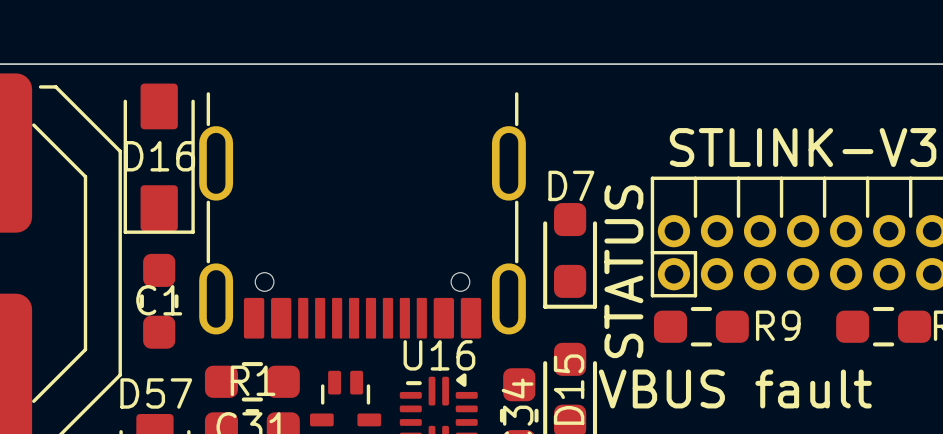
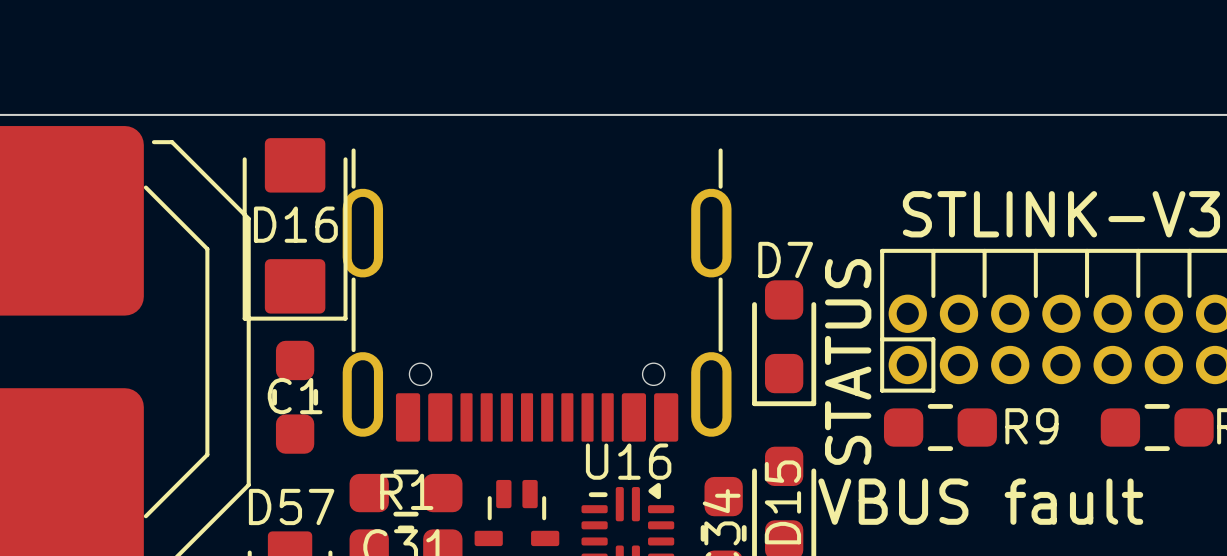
D16 footprint: [123, 83, 195, 234] -> [242, 138, 348, 321]

